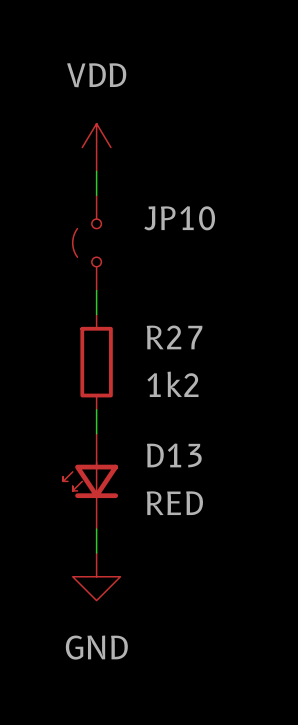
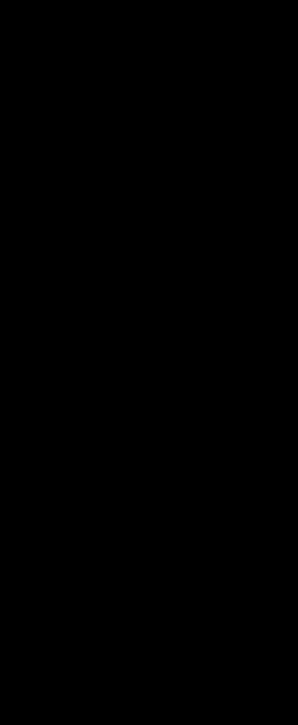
power symbol: VDD (96, 147) -> none
wire: (96, 171) (96, 195) -> none
JP10: (87, 242) -> none
wire: (96, 290) (96, 314) -> none
R27: 1k2 (96, 362) -> none
wire: (96, 409) (96, 433) -> none
D13: RED (90, 481) -> none
wire: (96, 529) (96, 552) -> none
power symbol: GND (96, 576) -> none

